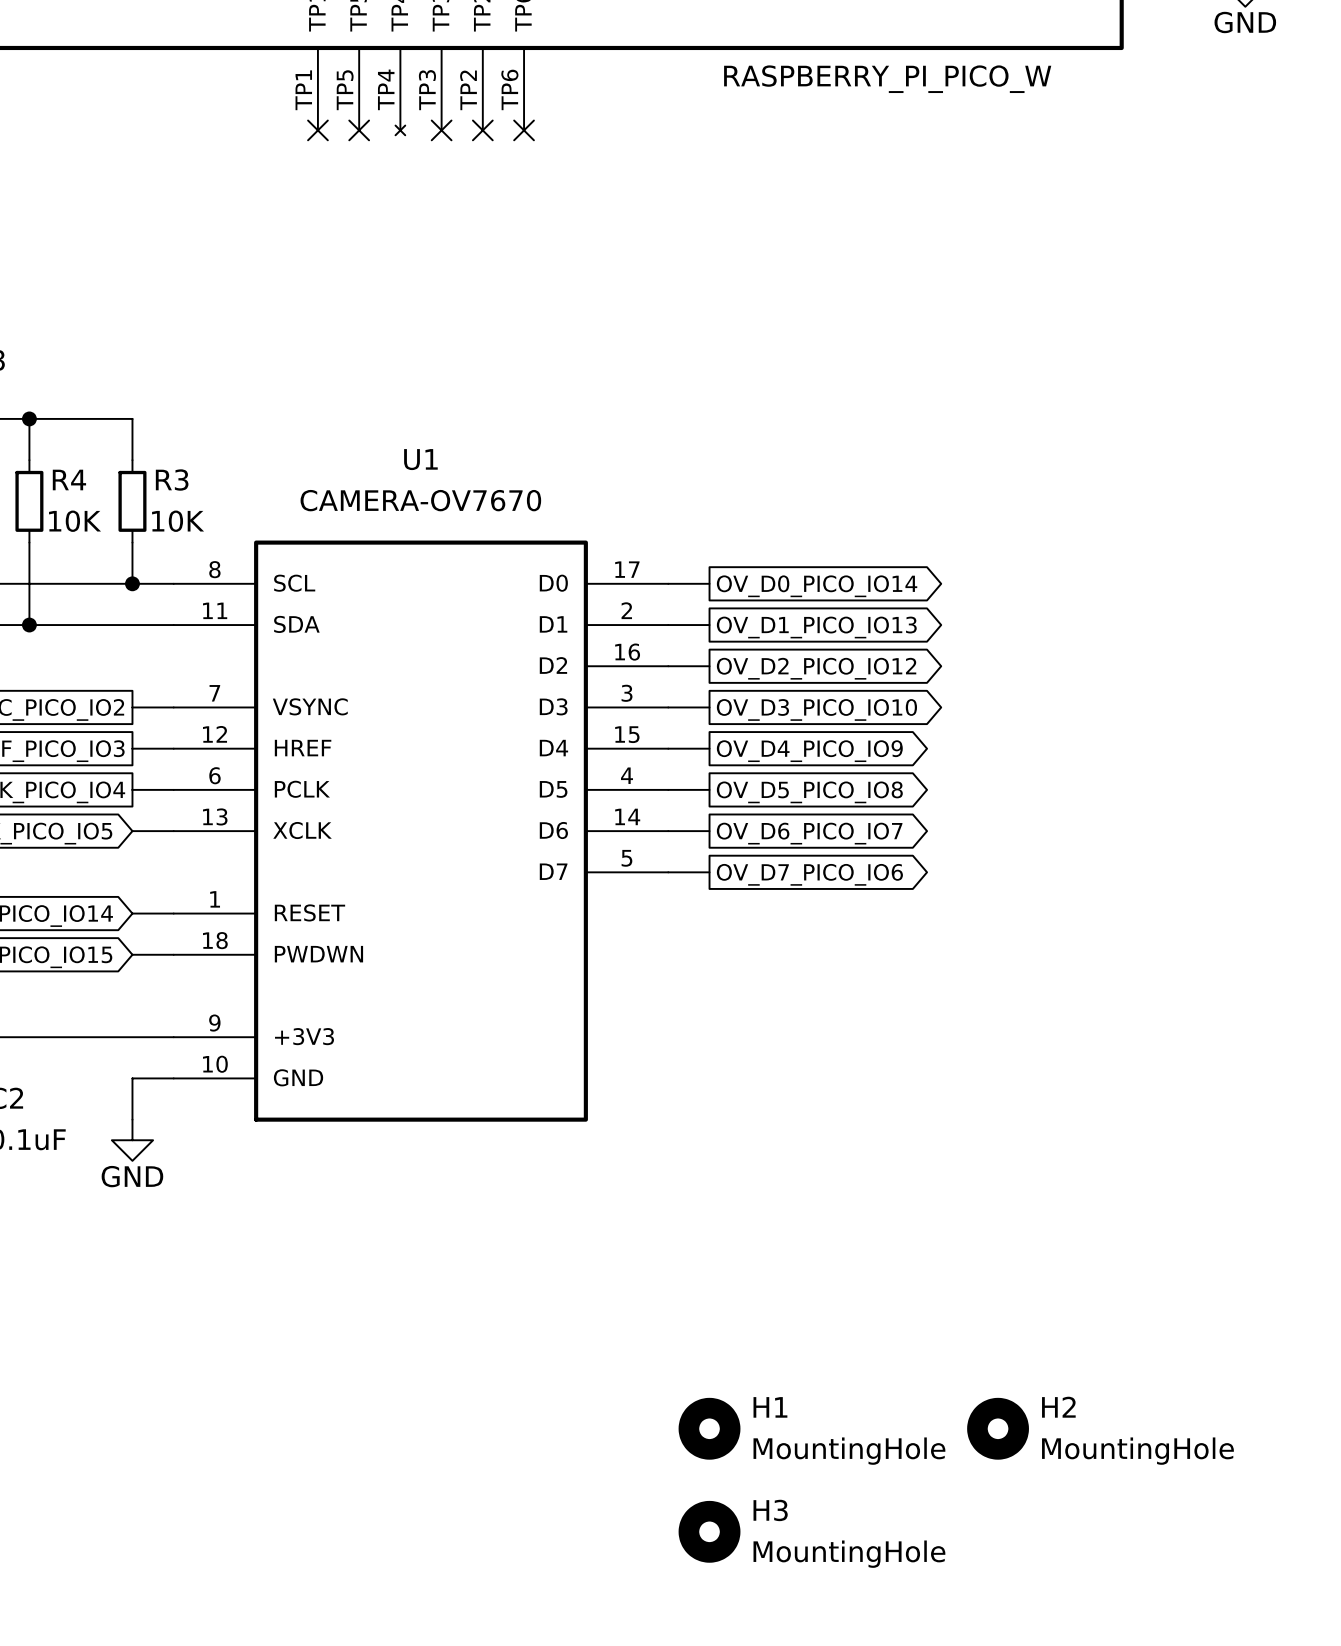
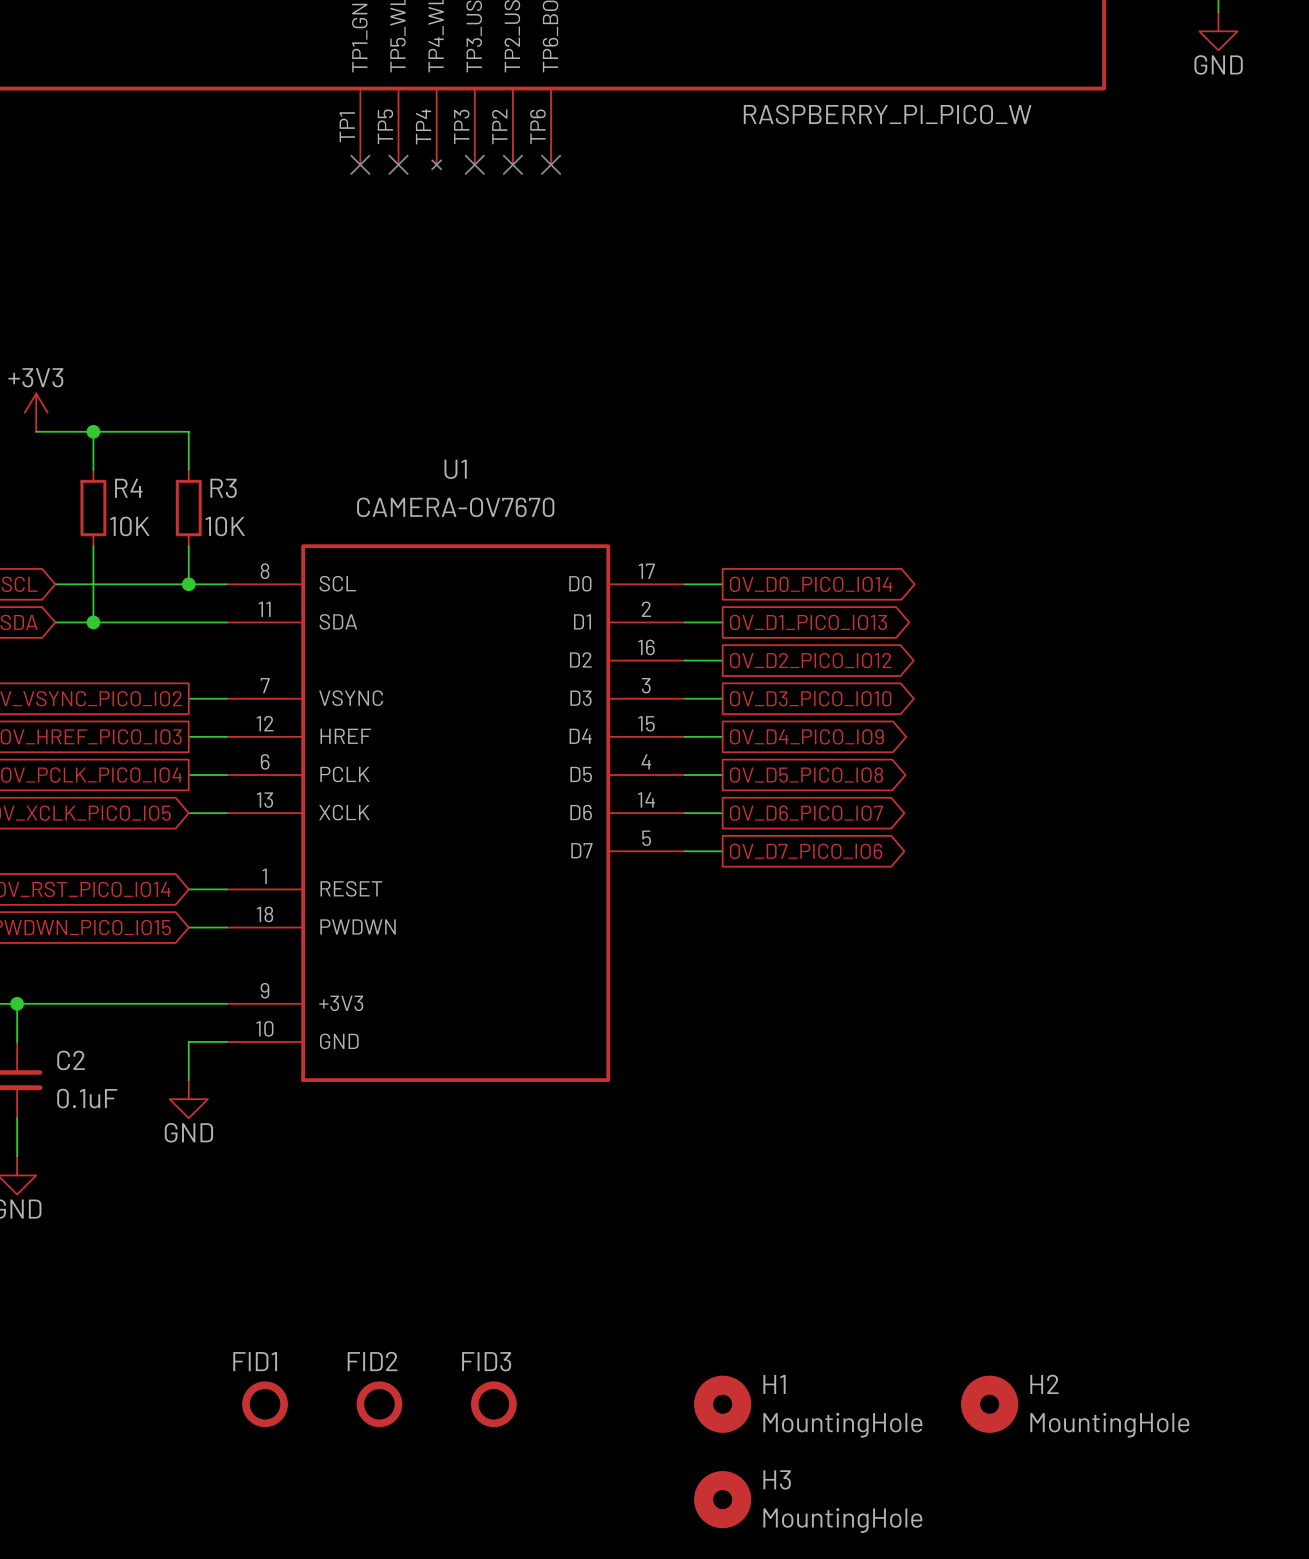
H1 position: (709, 1428) -> (722, 1404)
H2 position: (998, 1428) -> (989, 1404)
FID1: none -> (265, 1404)
FID2: none -> (379, 1404)
FID3: none -> (493, 1404)
H3 position: (709, 1531) -> (722, 1499)

